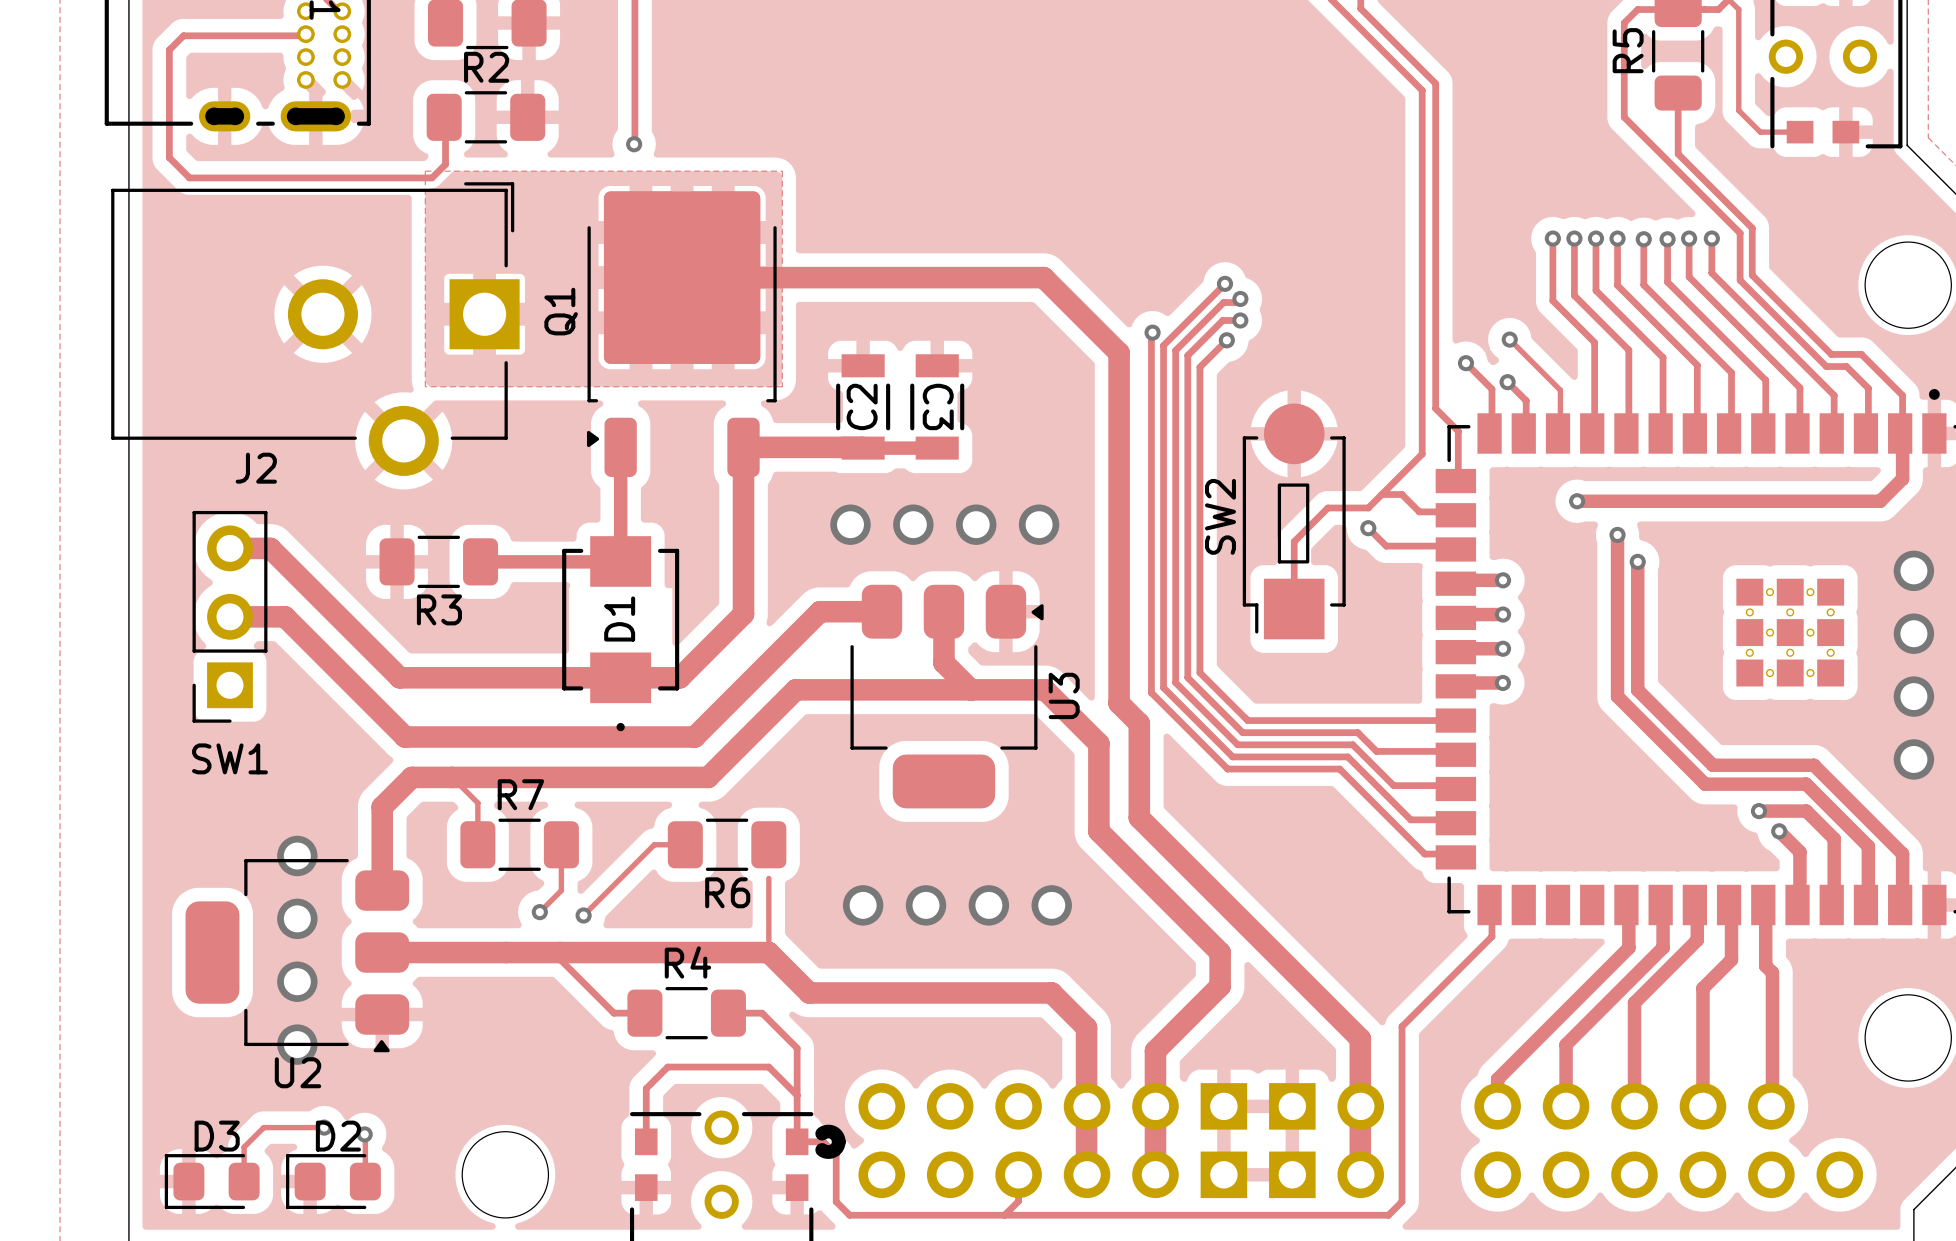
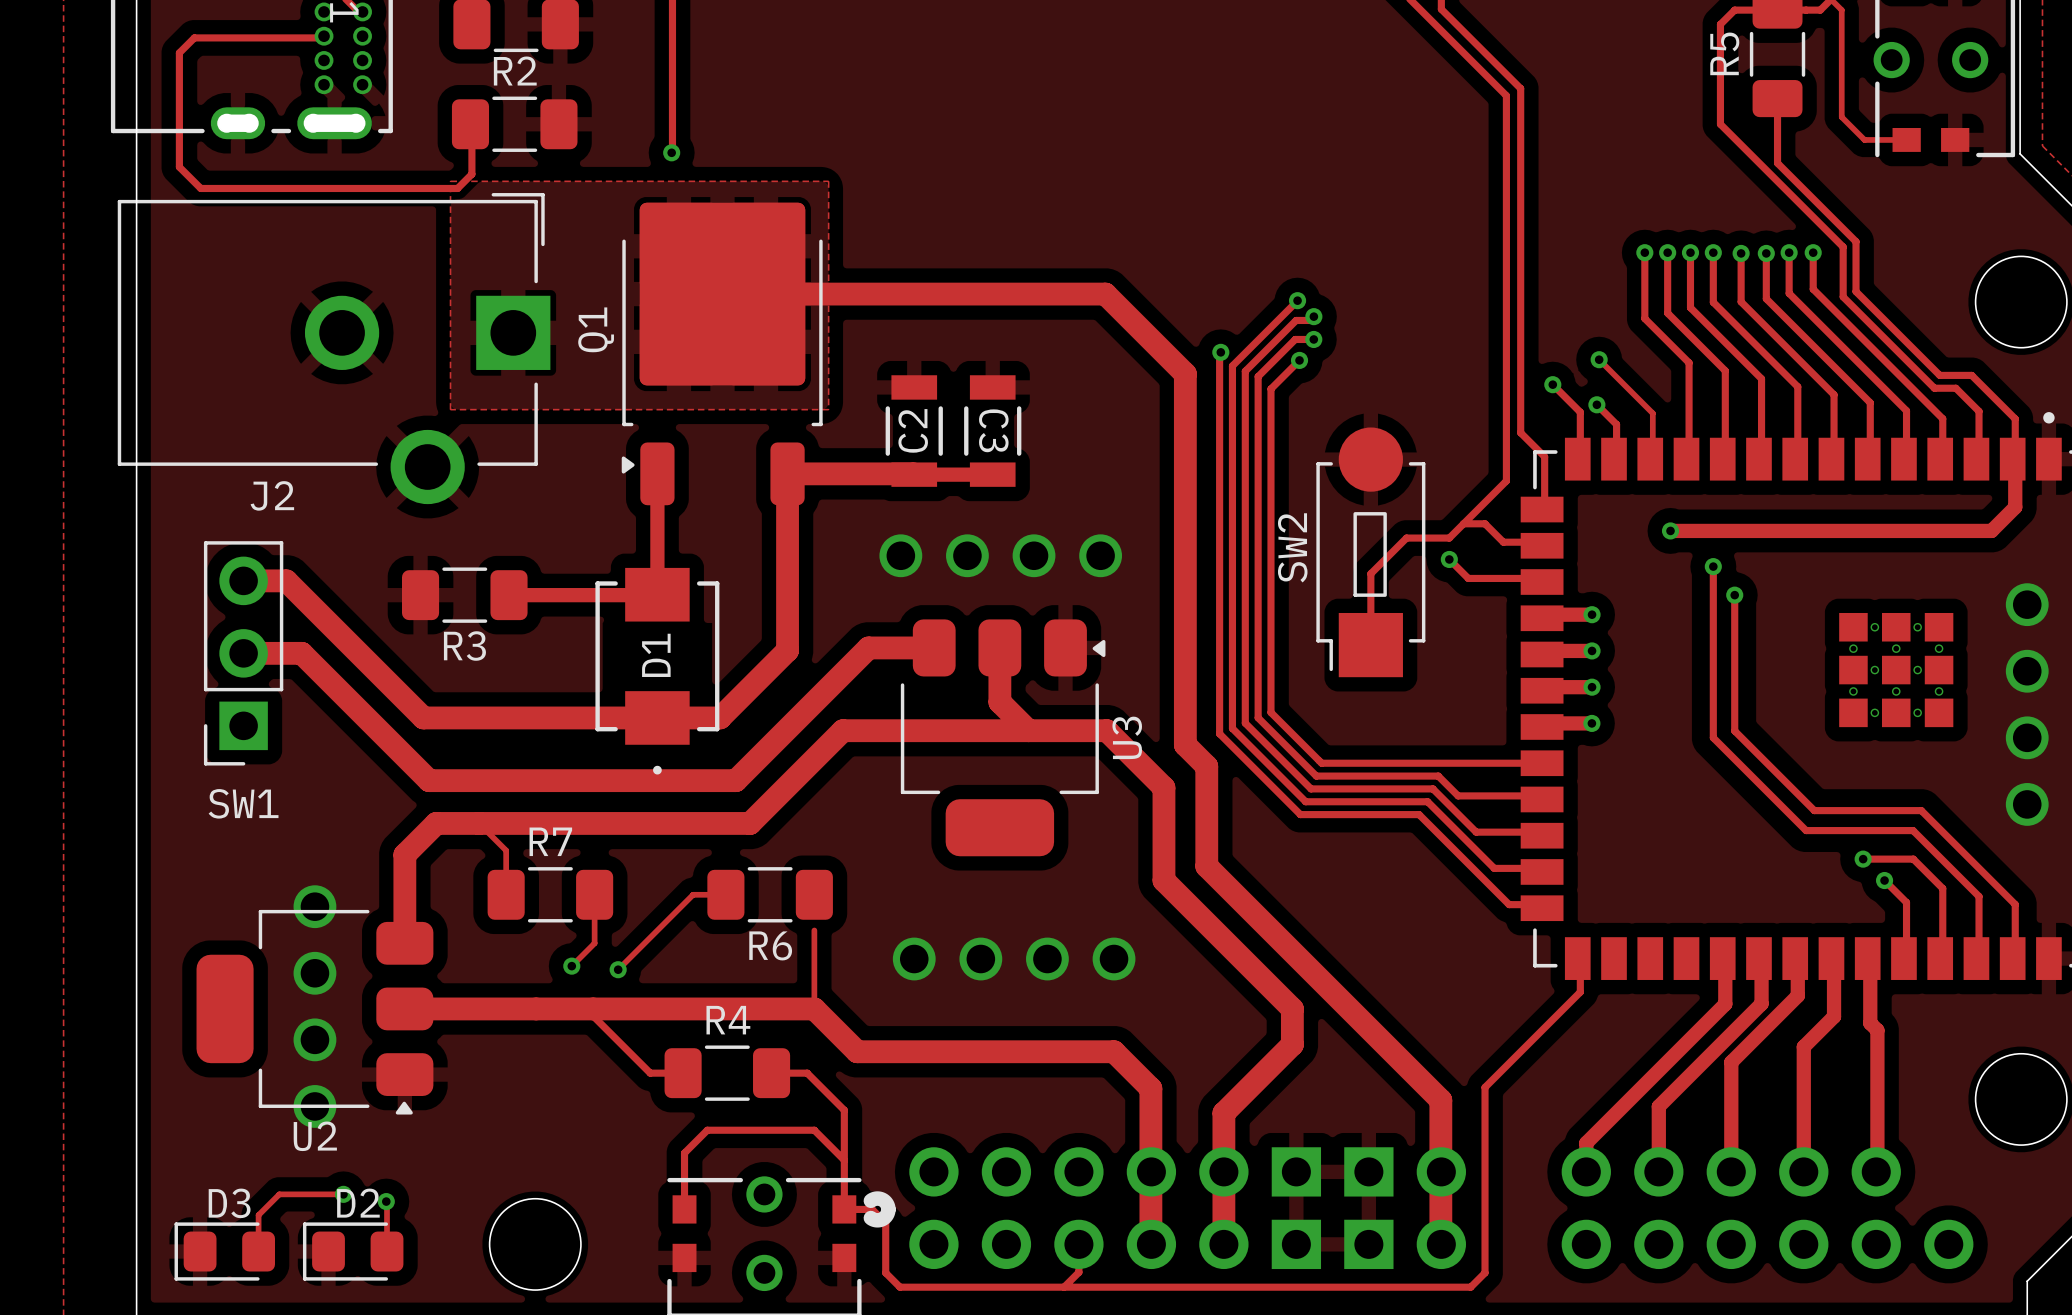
track width: thick (1617, 534) (1617, 696) (1705, 784) (1806, 784) (1868, 846) (1868, 901) -> thin (1713, 566) (1713, 737) (1806, 830) (1913, 830) (1979, 896) (1979, 955)
track width: thick (1637, 561) (1637, 690) (1712, 765) (1813, 765) (1902, 853) (1902, 901) -> thin (1734, 595) (1734, 730) (1814, 810) (1921, 810) (2015, 904) (2015, 955)
track width: thick (1758, 811) (1806, 811) (1834, 838) (1834, 901) -> thin (1863, 859) (1913, 859) (1942, 888) (1942, 955)
track width: thick (1779, 831) (1799, 852) (1799, 901) -> thin (1884, 880) (1906, 902) (1906, 955)

